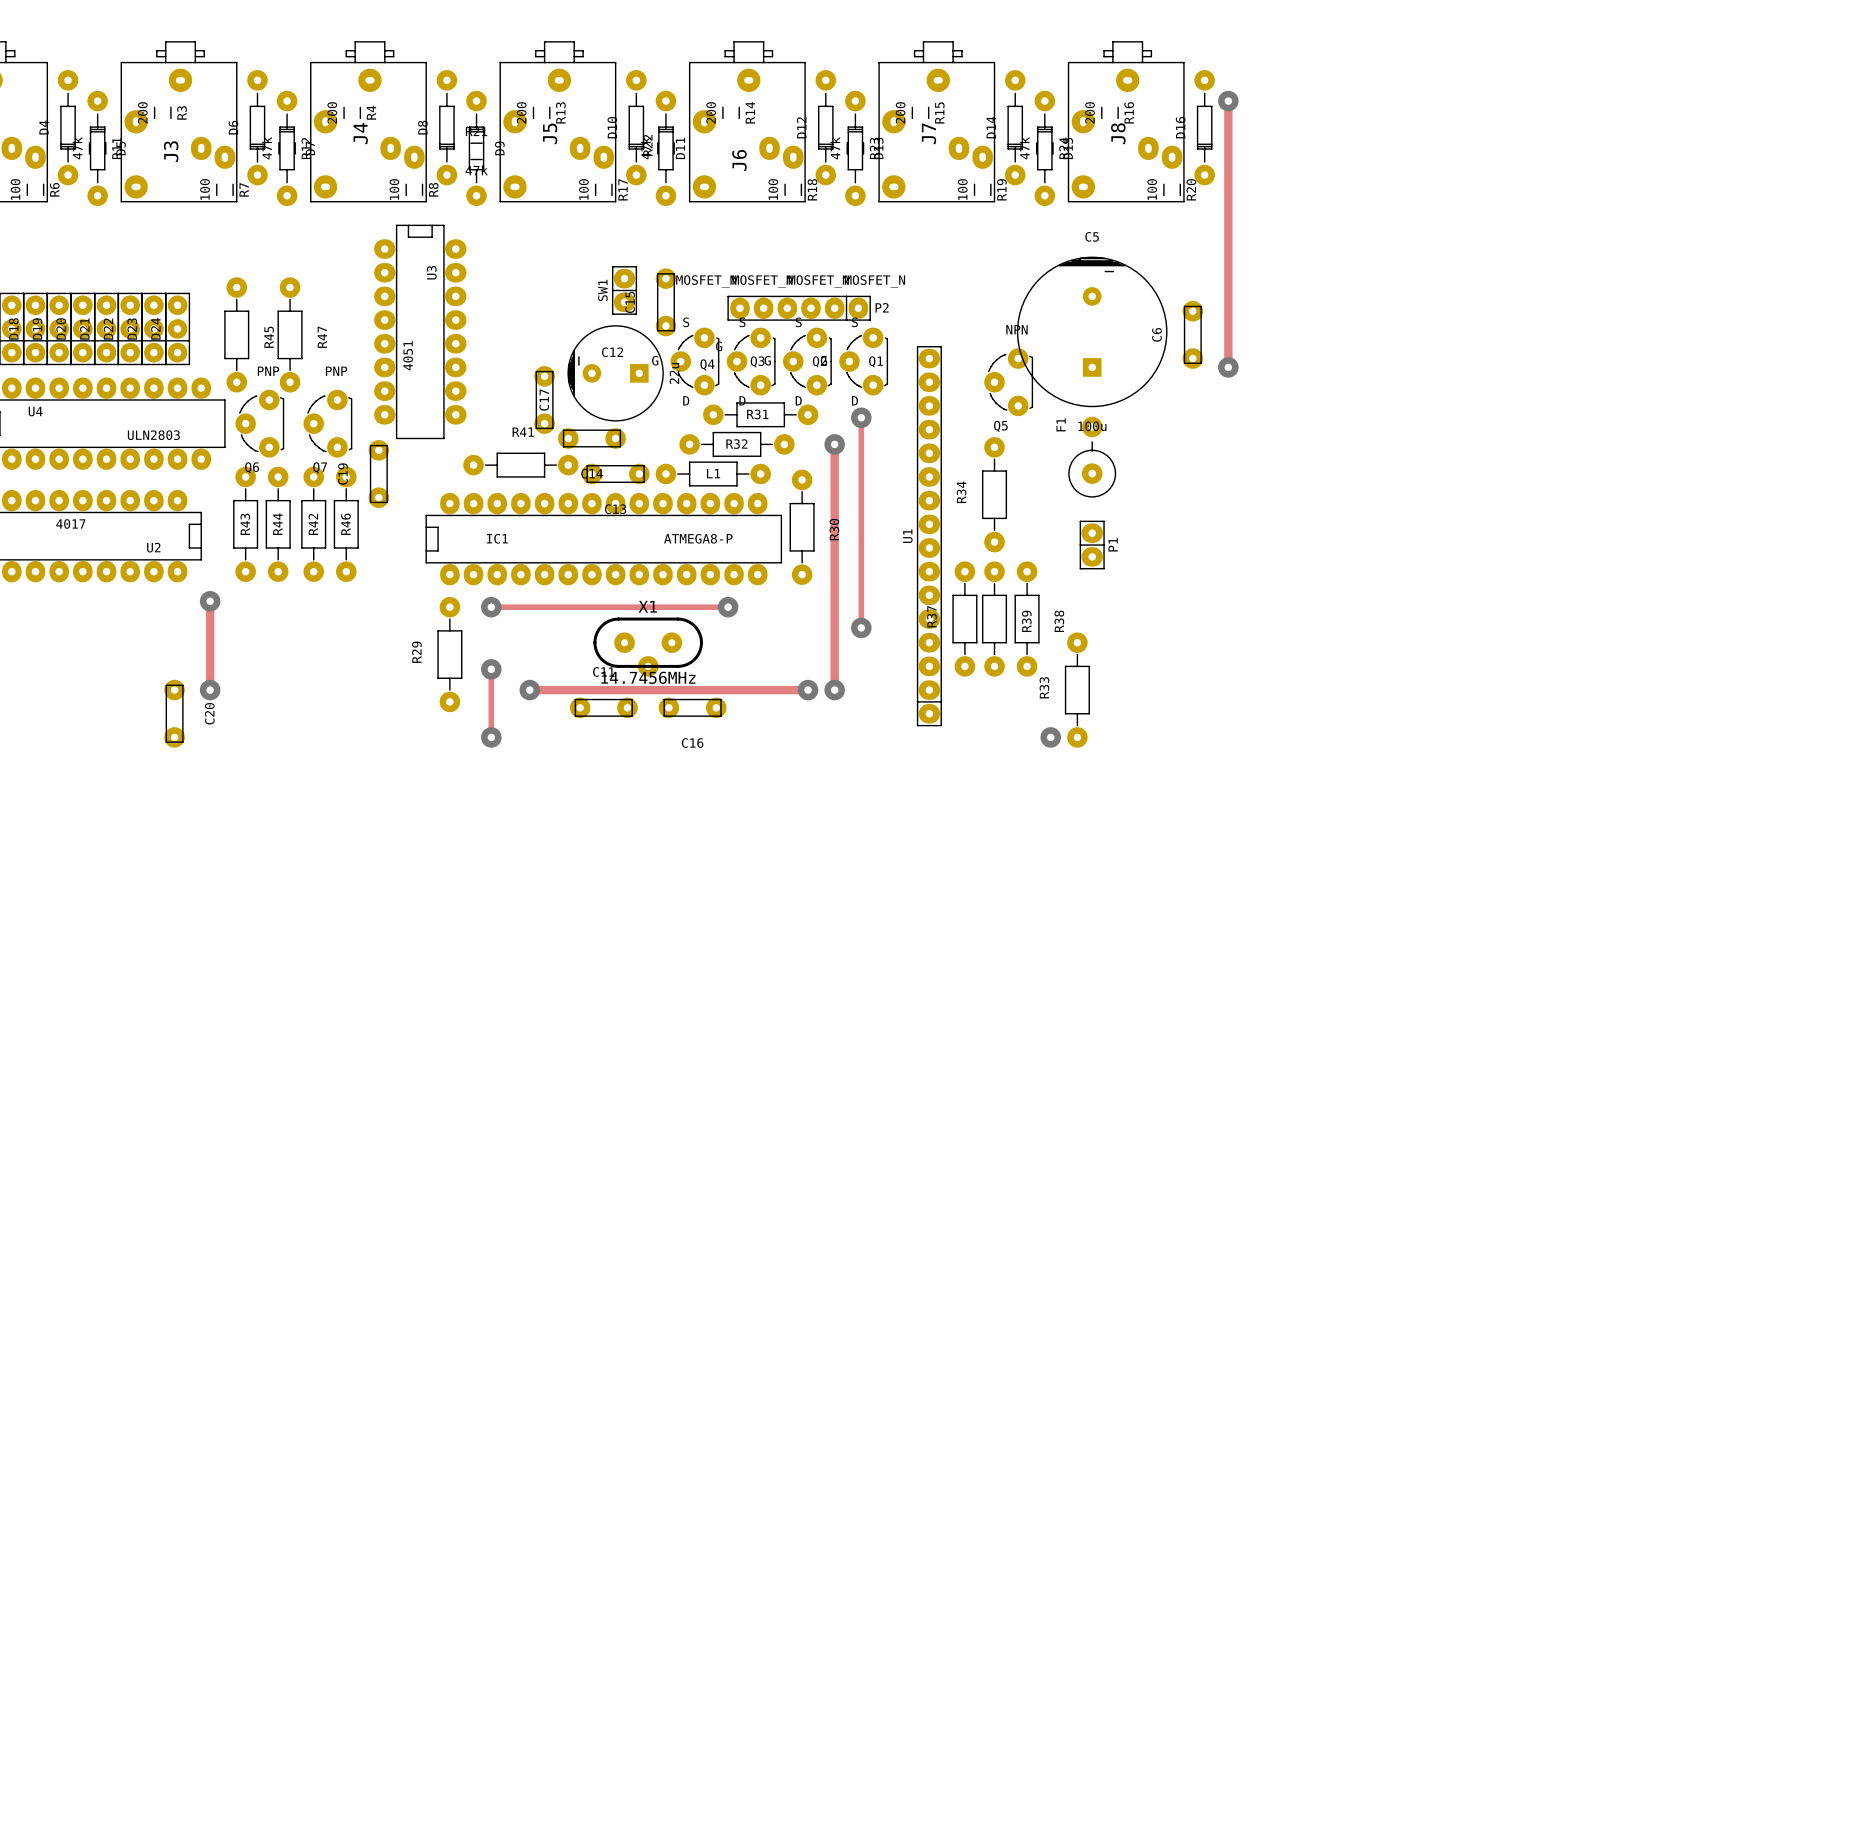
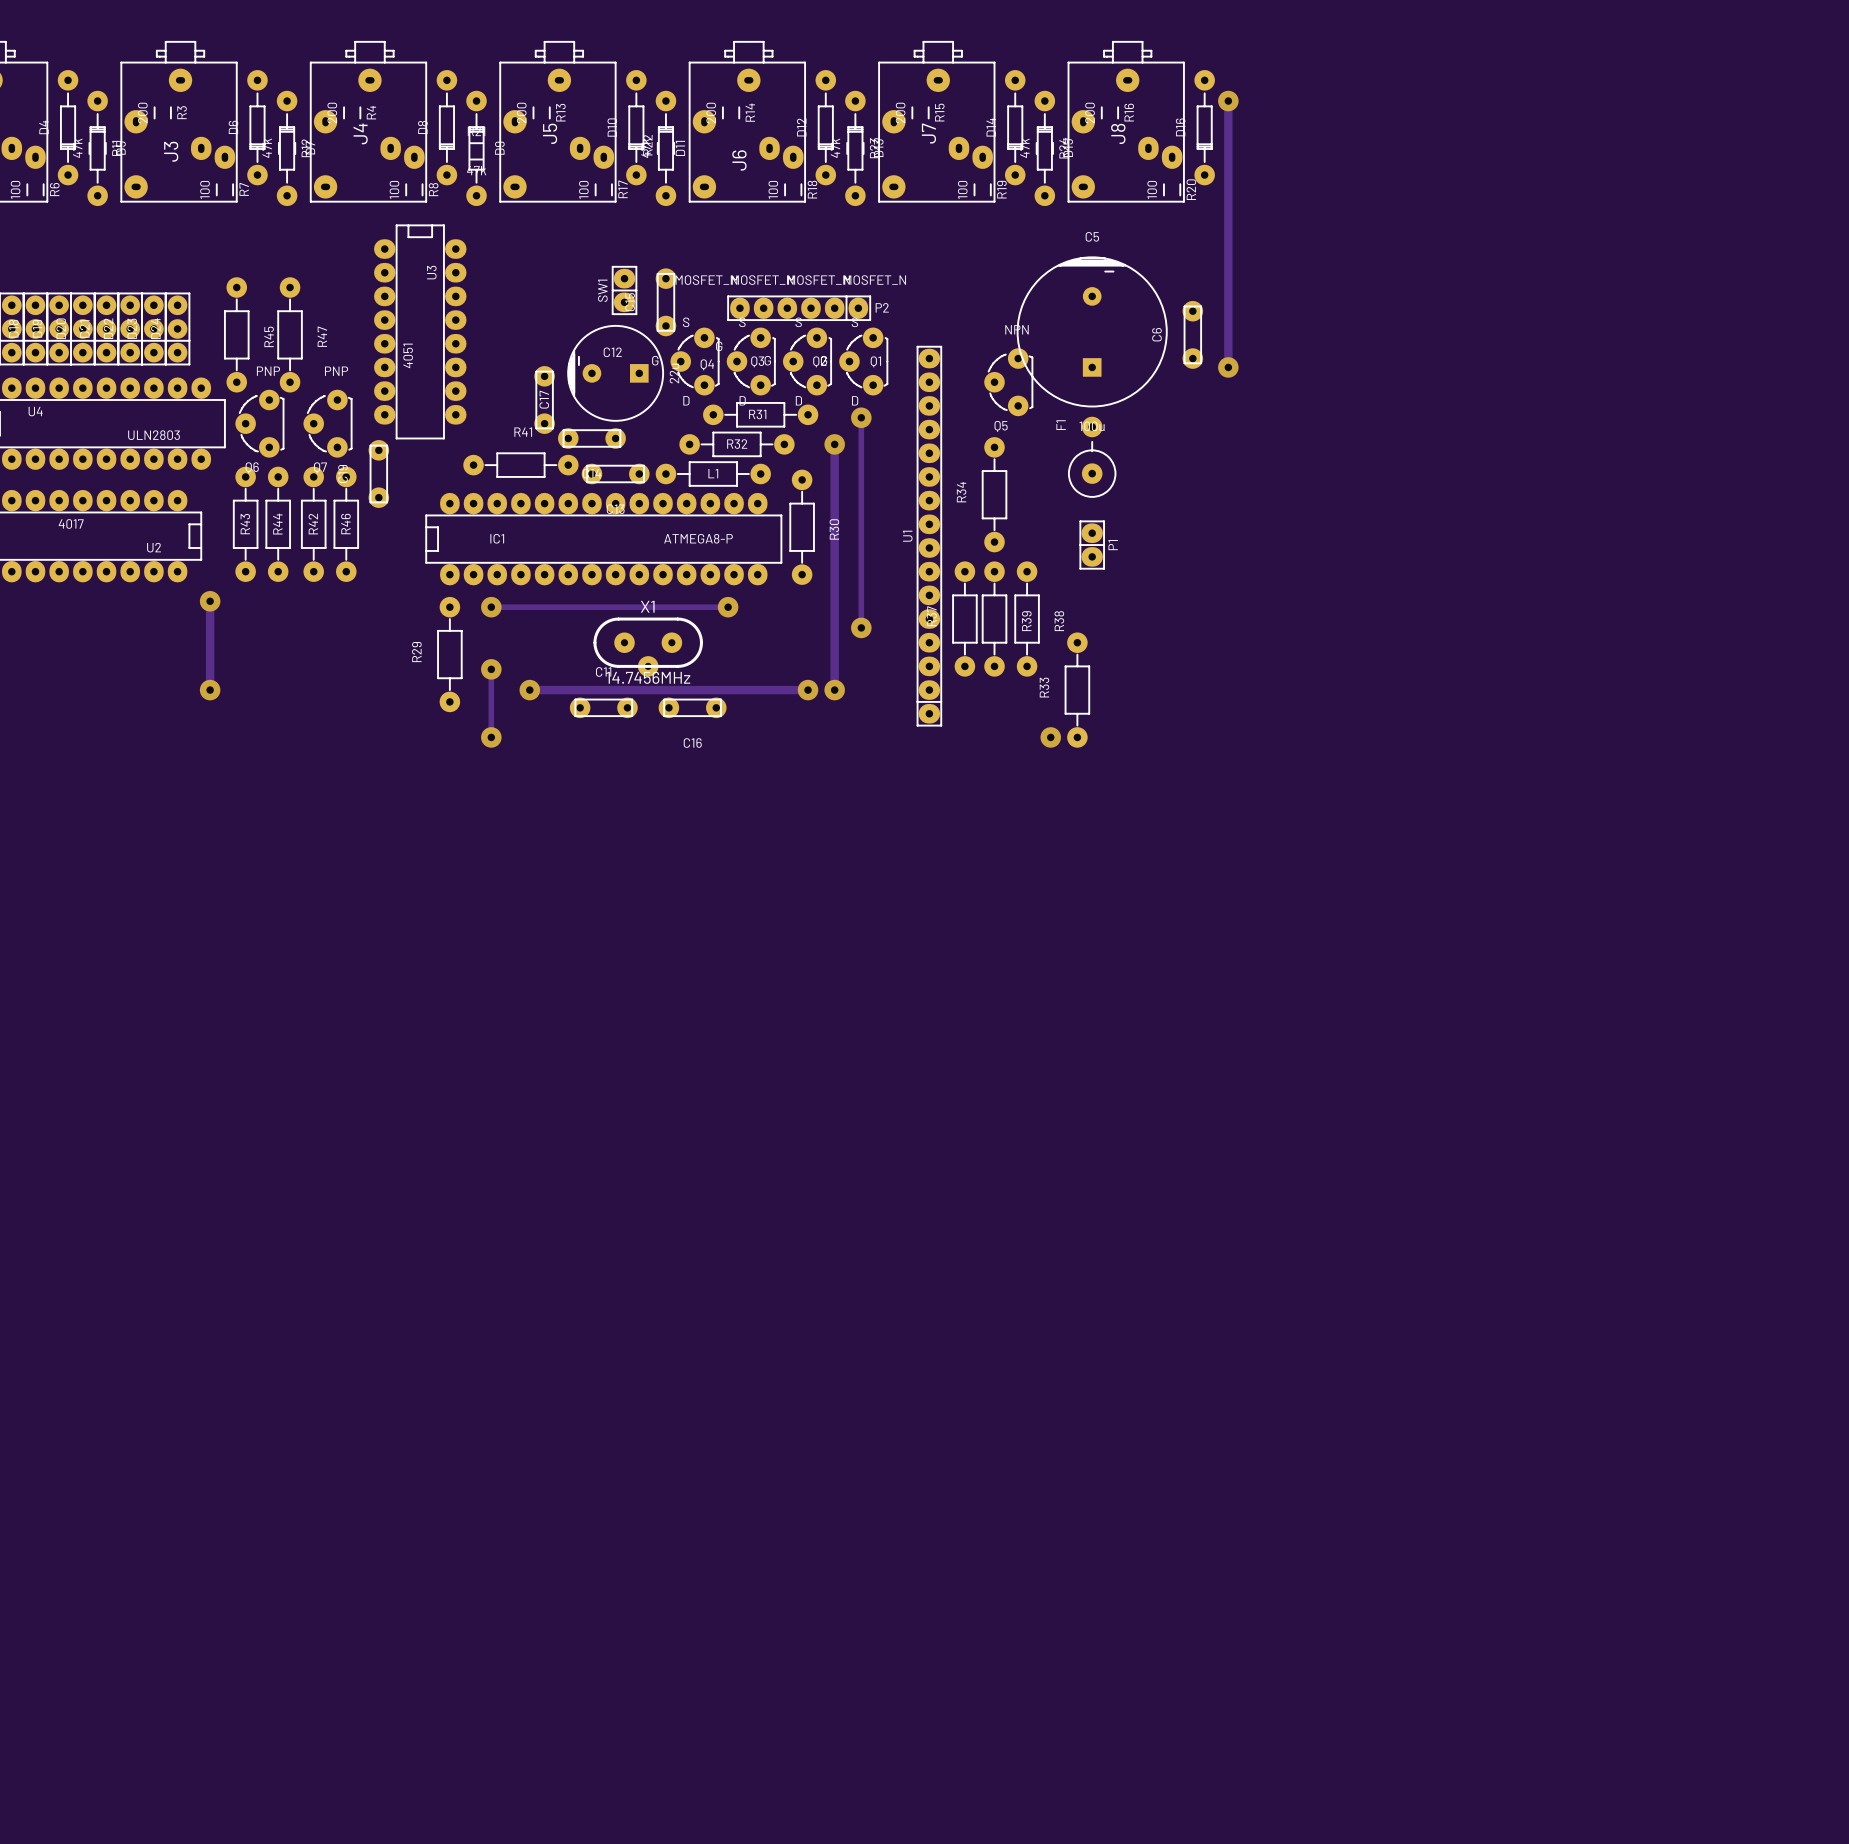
C20: (174, 713) -> none

